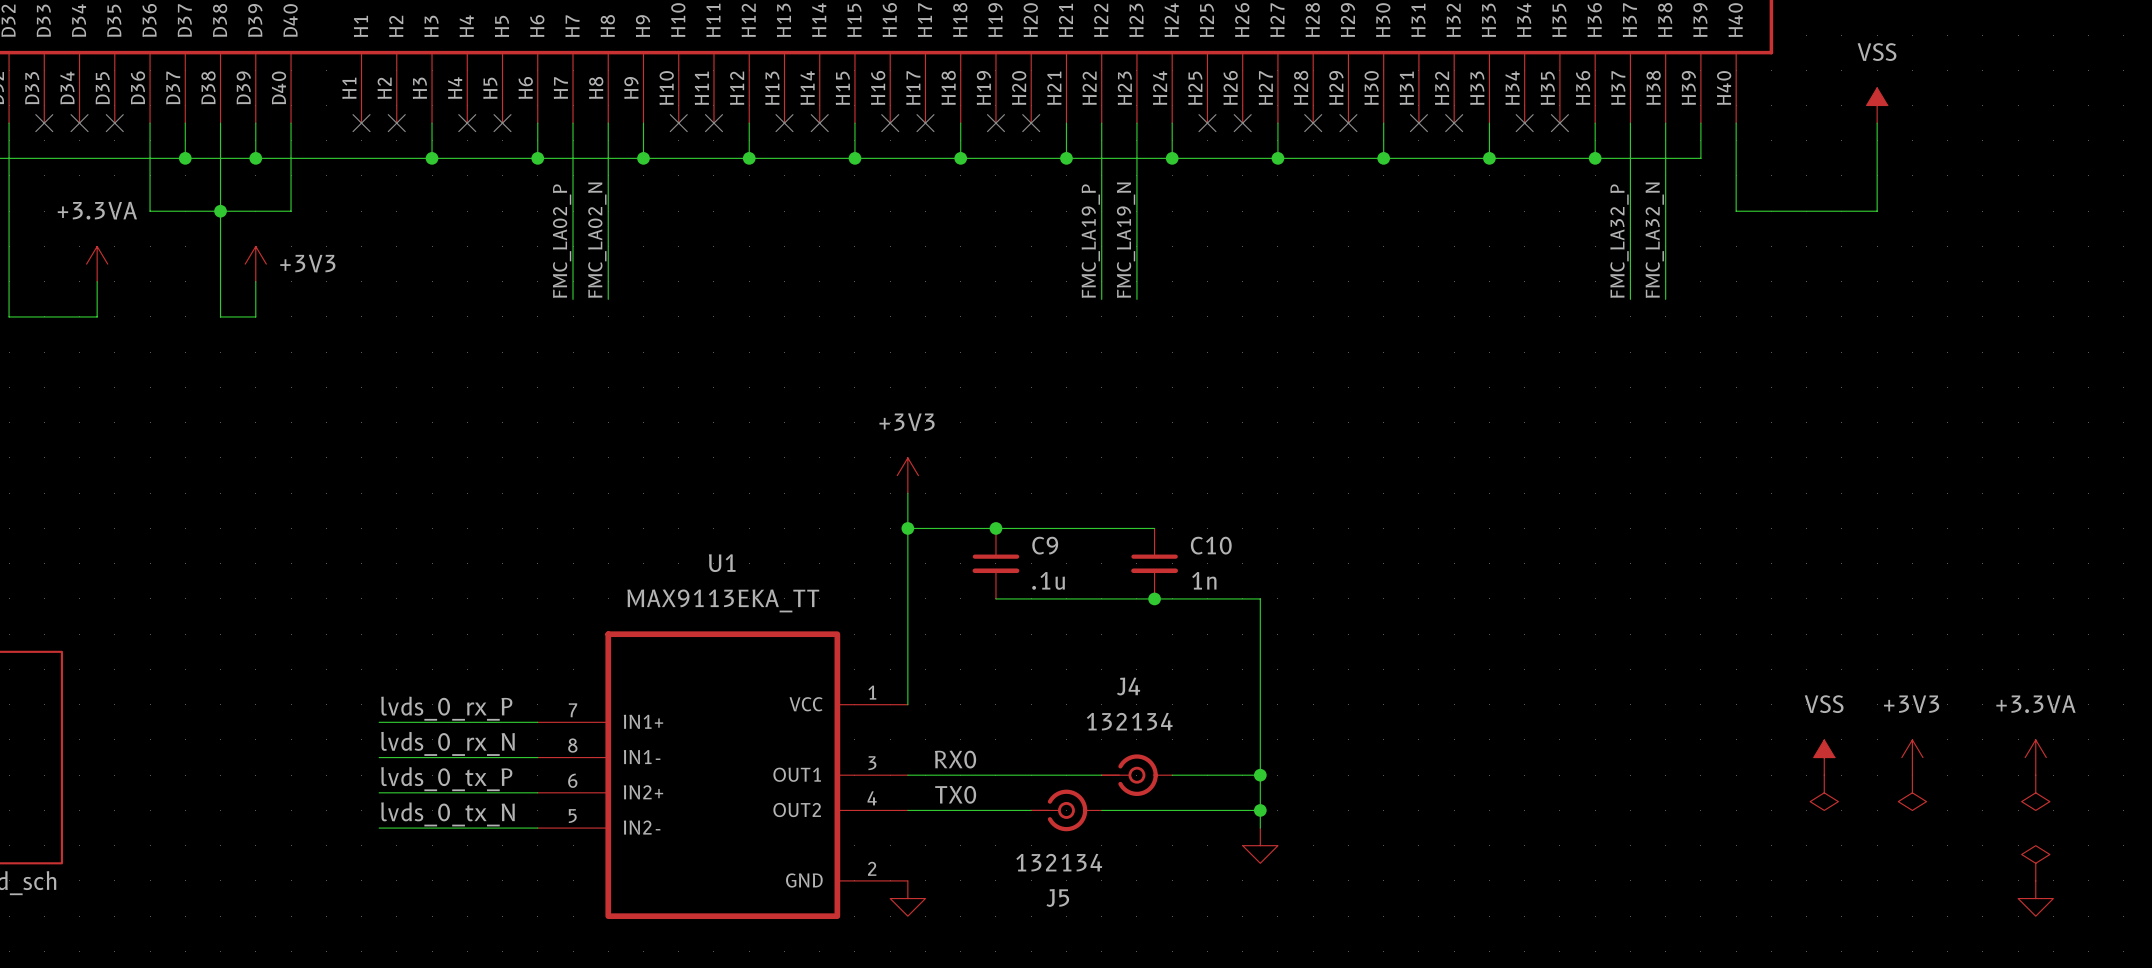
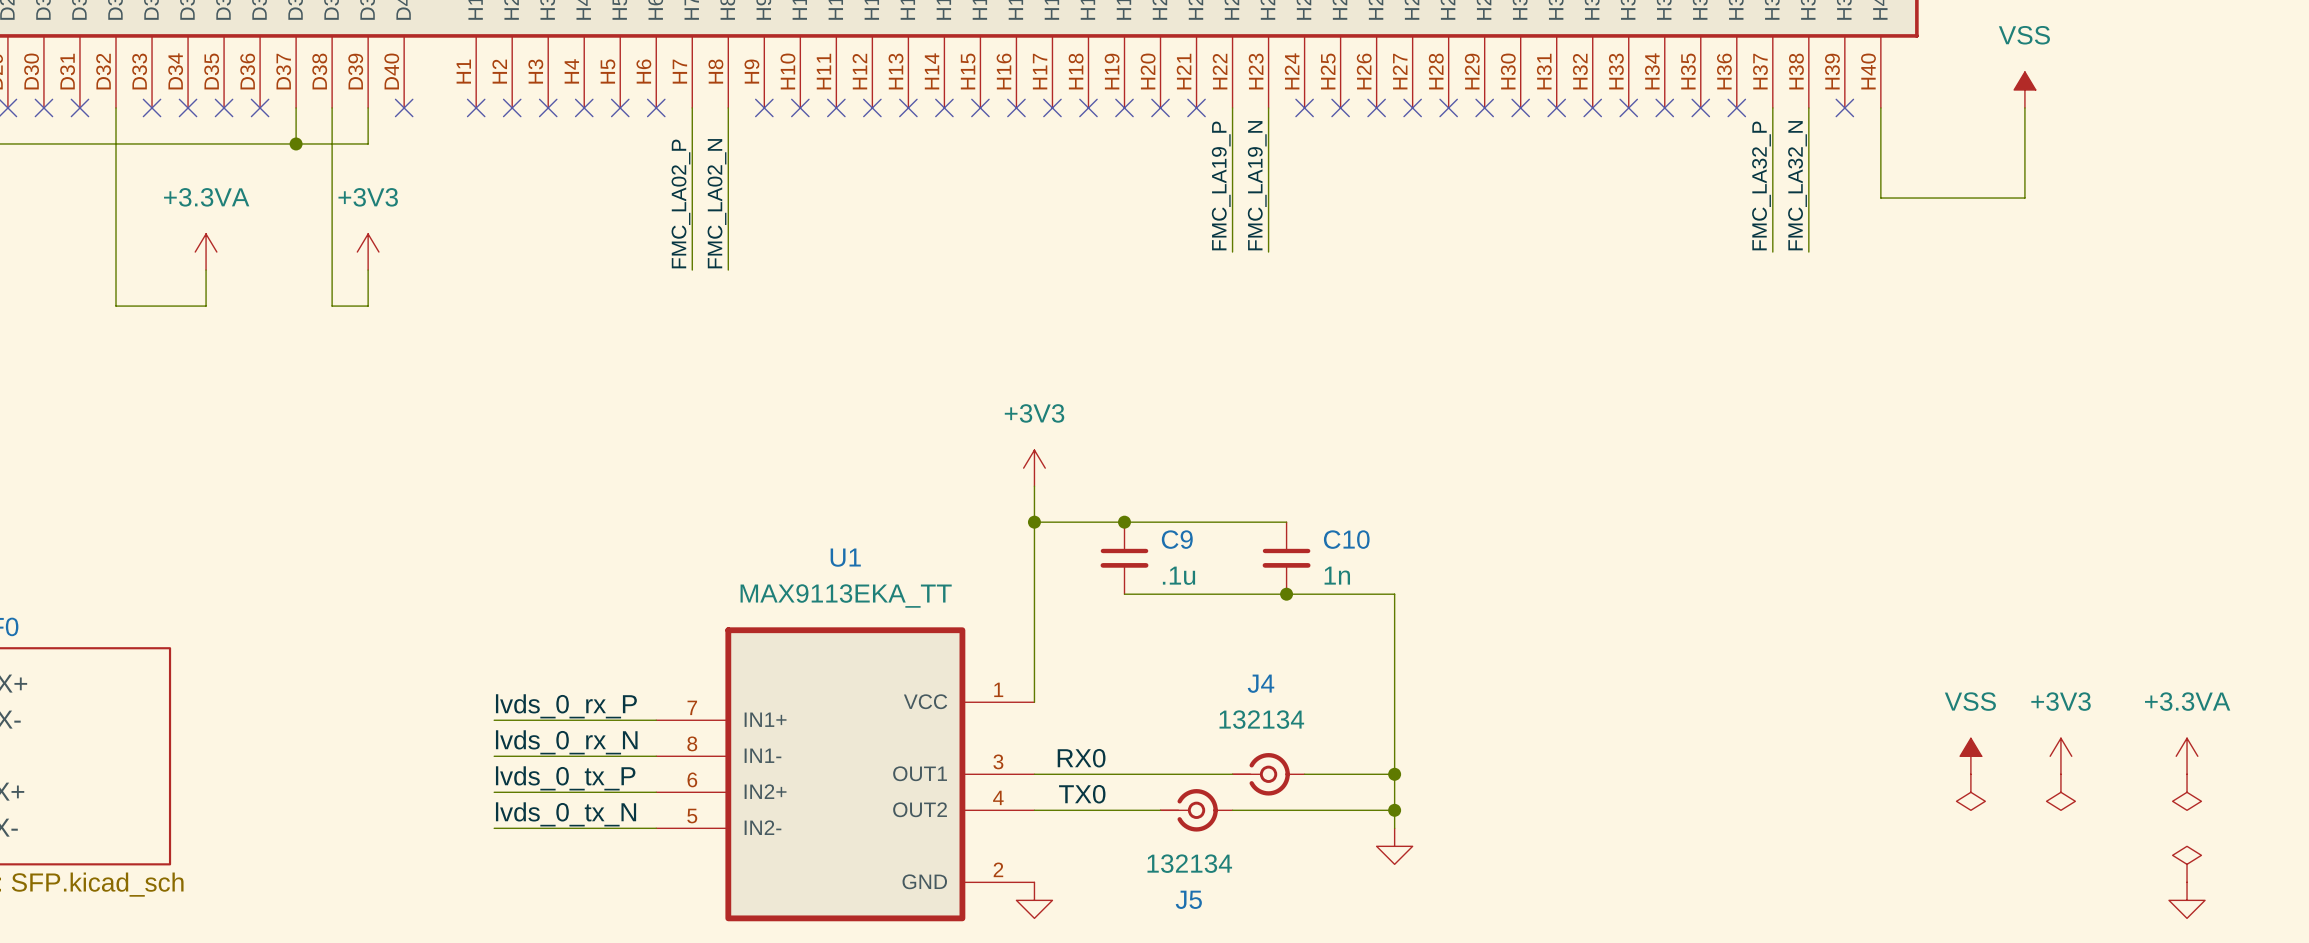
wire: (150, 123) (150, 211) (291, 211) (291, 123) -> none
no-connect mark: none -> (260, 107)
no-connect mark: none -> (404, 107)
wire: (432, 123) (432, 158) -> none
no-connect mark: none -> (548, 107)
wire: (537, 123) (537, 158) -> none
no-connect mark: none -> (656, 107)
wire: (643, 123) (643, 158) -> none
no-connect mark: none -> (764, 107)
wire: (749, 123) (749, 158) -> none
no-connect mark: none -> (872, 107)
wire: (854, 123) (854, 158) -> none
no-connect mark: none -> (980, 107)
wire: (960, 123) (960, 158) -> none
no-connect mark: none -> (1088, 107)
wire: (1066, 123) (1066, 158) -> none
no-connect mark: none -> (1196, 107)
wire: (1172, 123) (1172, 158) -> none
no-connect mark: none -> (1304, 107)
wire: (1277, 123) (1277, 158) -> none
no-connect mark: none -> (1412, 107)
wire: (1383, 123) (1383, 158) -> none
no-connect mark: none -> (1520, 107)
wire: (1489, 123) (1489, 158) -> none
no-connect mark: none -> (1628, 107)
wire: (1595, 123) (1595, 158) -> none
no-connect mark: none -> (1736, 107)
wire: (1700, 123) (1700, 158) (255, 158) -> none
no-connect mark: none -> (1844, 107)
junction: (255, 158) -> none
junction: (432, 158) -> none
junction: (537, 158) -> none
junction: (643, 158) -> none
junction: (749, 158) -> none
junction: (854, 158) -> none
junction: (960, 158) -> none
junction: (1066, 158) -> none
junction: (1172, 158) -> none
junction: (1277, 158) -> none
junction: (1383, 158) -> none
junction: (1489, 158) -> none
junction: (1595, 158) -> none
junction: (220, 211) -> none
label position: FMC_LA02_N (597, 240) -> FMC_LA02_N (716, 203)
label position: FMC_LA19_N (1126, 240) -> FMC_LA19_N (1257, 185)
label position: FMC_LA32_N (1654, 240) -> FMC_LA32_N (1797, 185)
label position: FMC_LA02_P (562, 241) -> FMC_LA02_P (680, 203)
label position: FMC_LA19_P (1090, 241) -> FMC_LA19_P (1221, 185)
label position: FMC_LA32_P (1619, 241) -> FMC_LA32_P (1761, 185)
power symbol text position: +3V3 (307, 263) -> +3V3 (368, 197)
wire: (1101, 264) (1101, 299) -> none
wire: (1136, 264) (1136, 299) -> none
wire: (1630, 264) (1630, 299) -> none
wire: (1665, 264) (1665, 299) -> none
wire: (573, 281) (573, 299) -> none
wire: (608, 281) (608, 299) -> none

